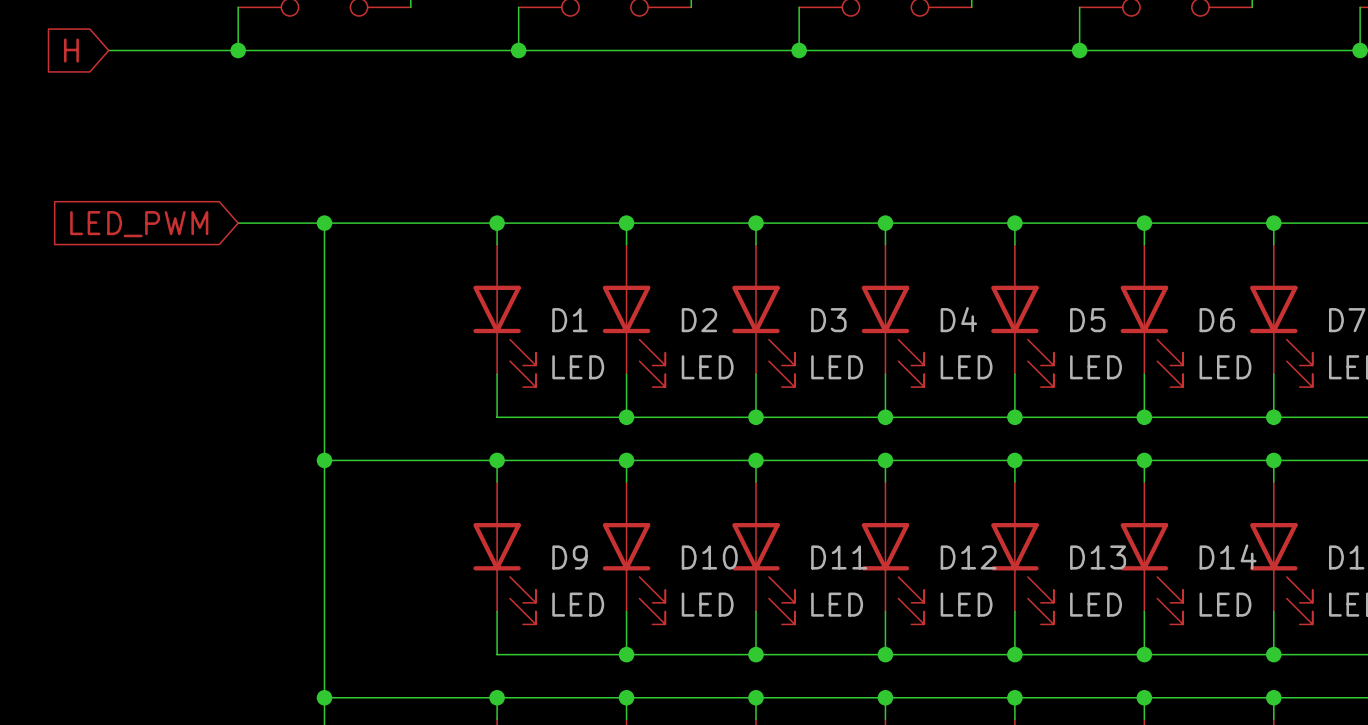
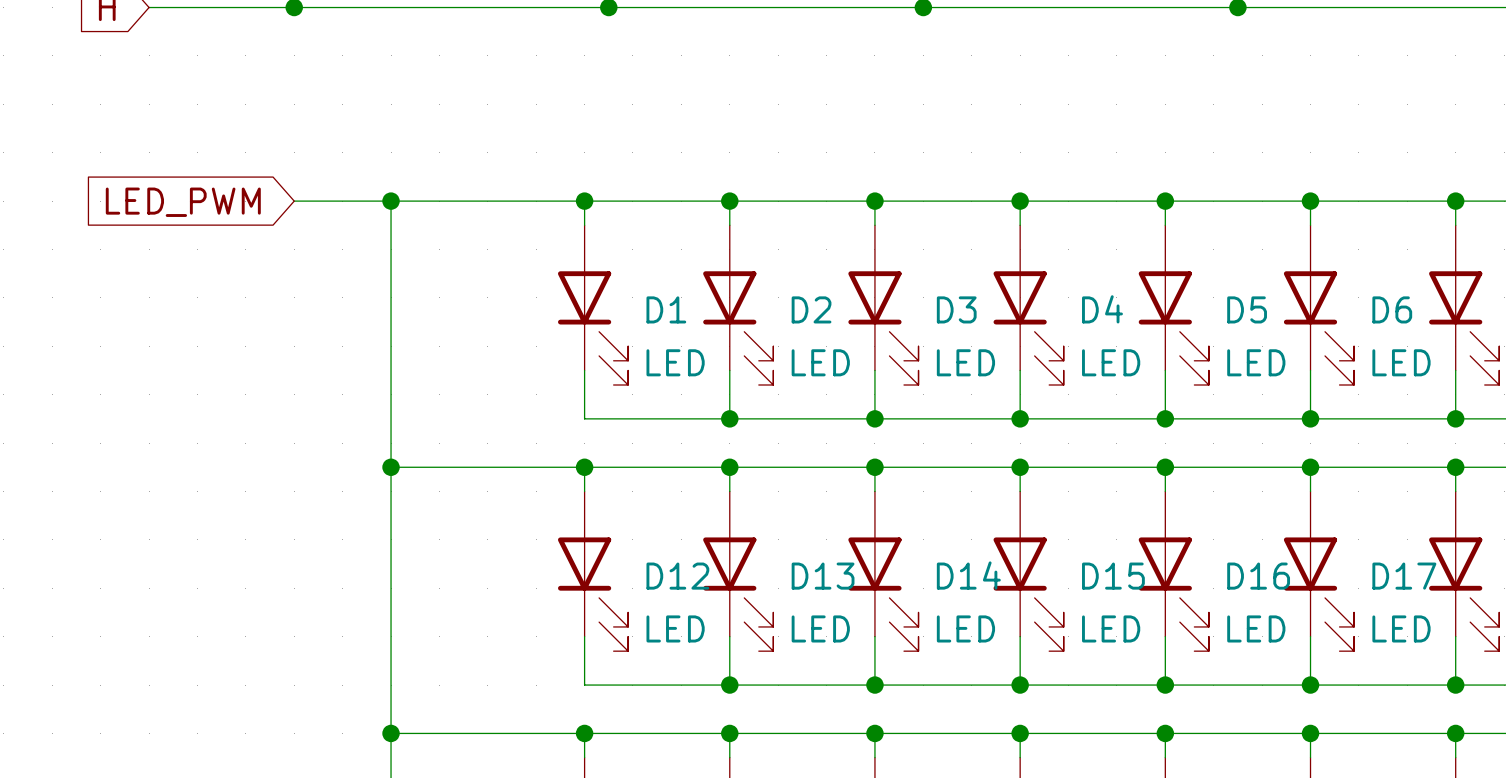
D14 name: D14 (1228, 556) -> D17 (1404, 576)
D9 name: D9 (569, 557) -> D12 (677, 576)
D10 name: D10 (709, 557) -> D13 (823, 576)
D11 name: D11 (839, 557) -> D14 (968, 575)
D12 name: D12 (968, 557) -> D15 (1113, 576)
D13 name: D13 (1098, 557) -> D16 (1258, 576)

